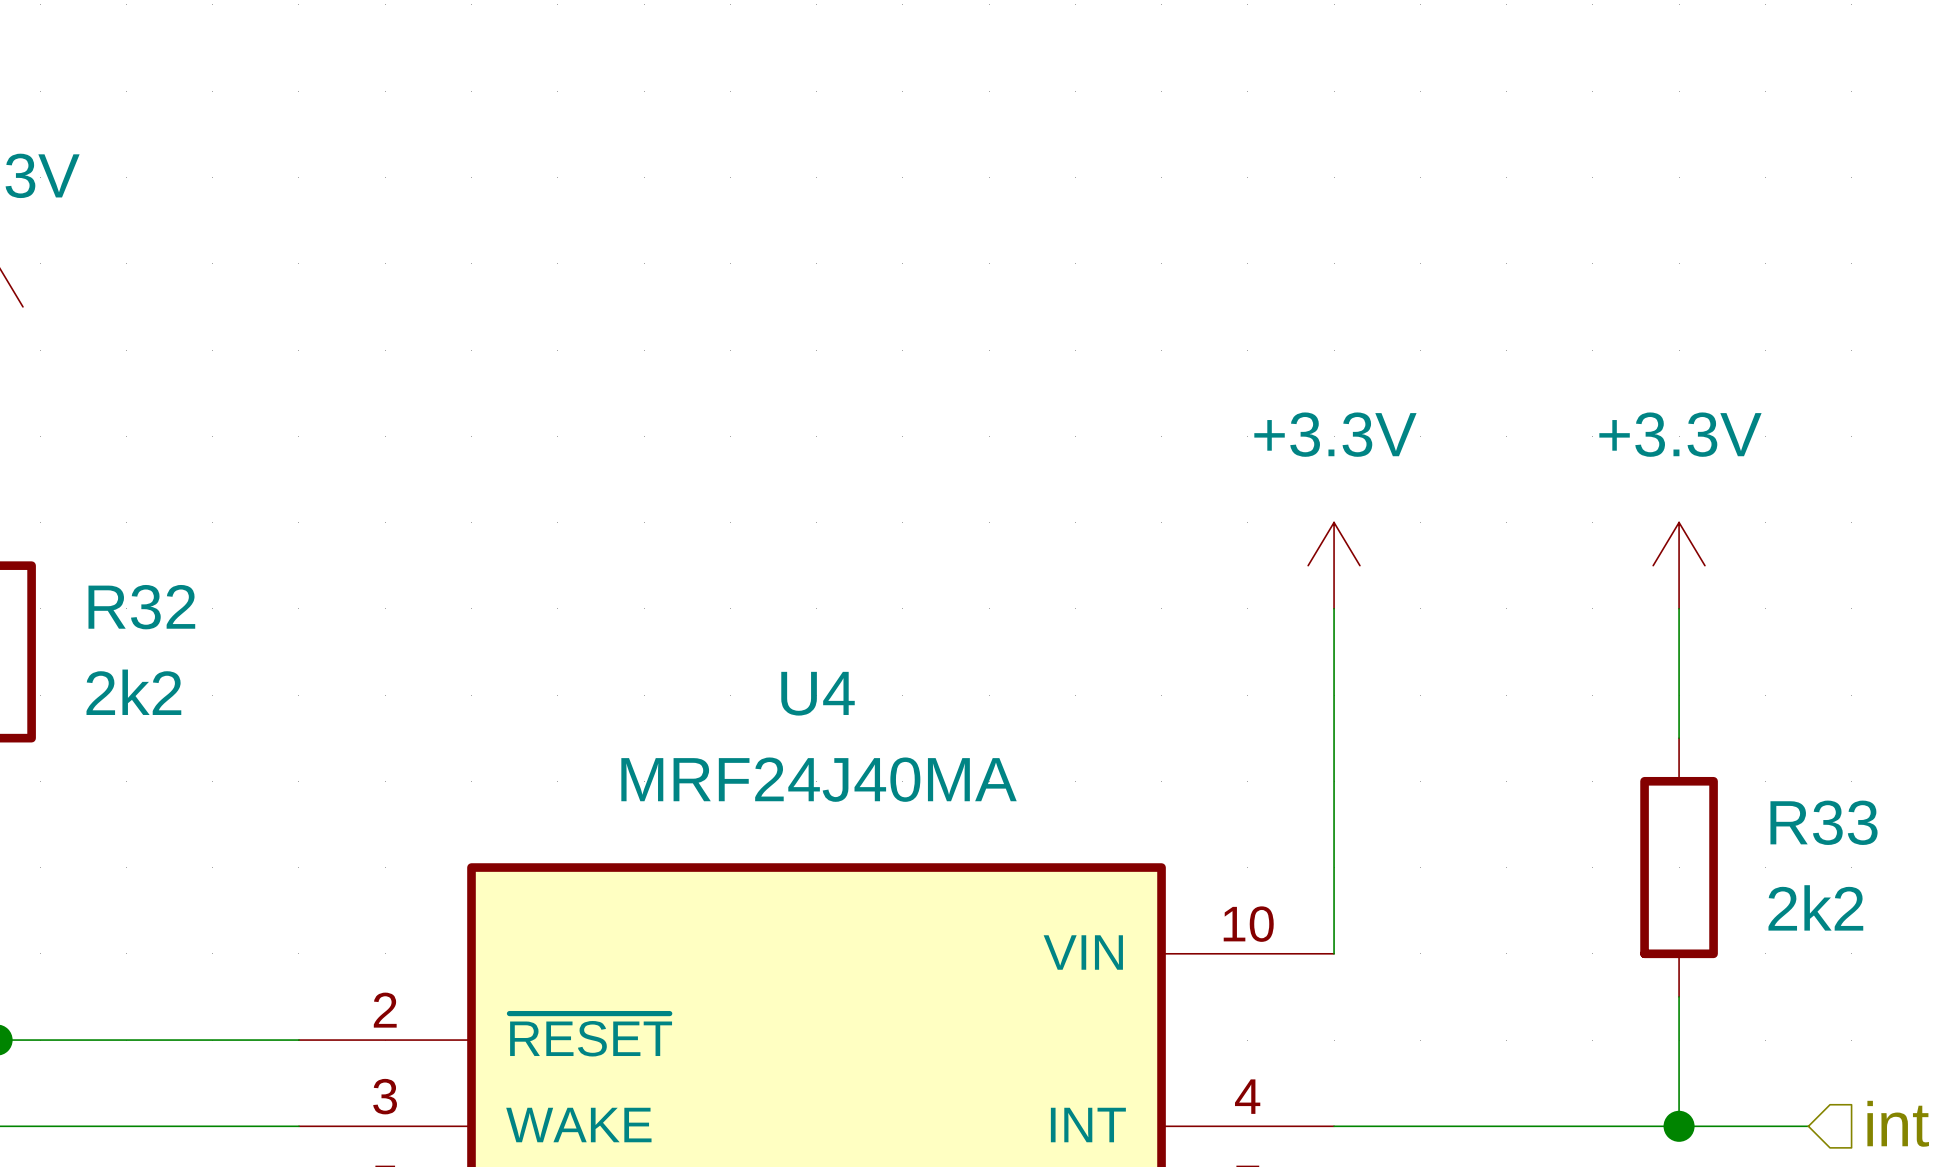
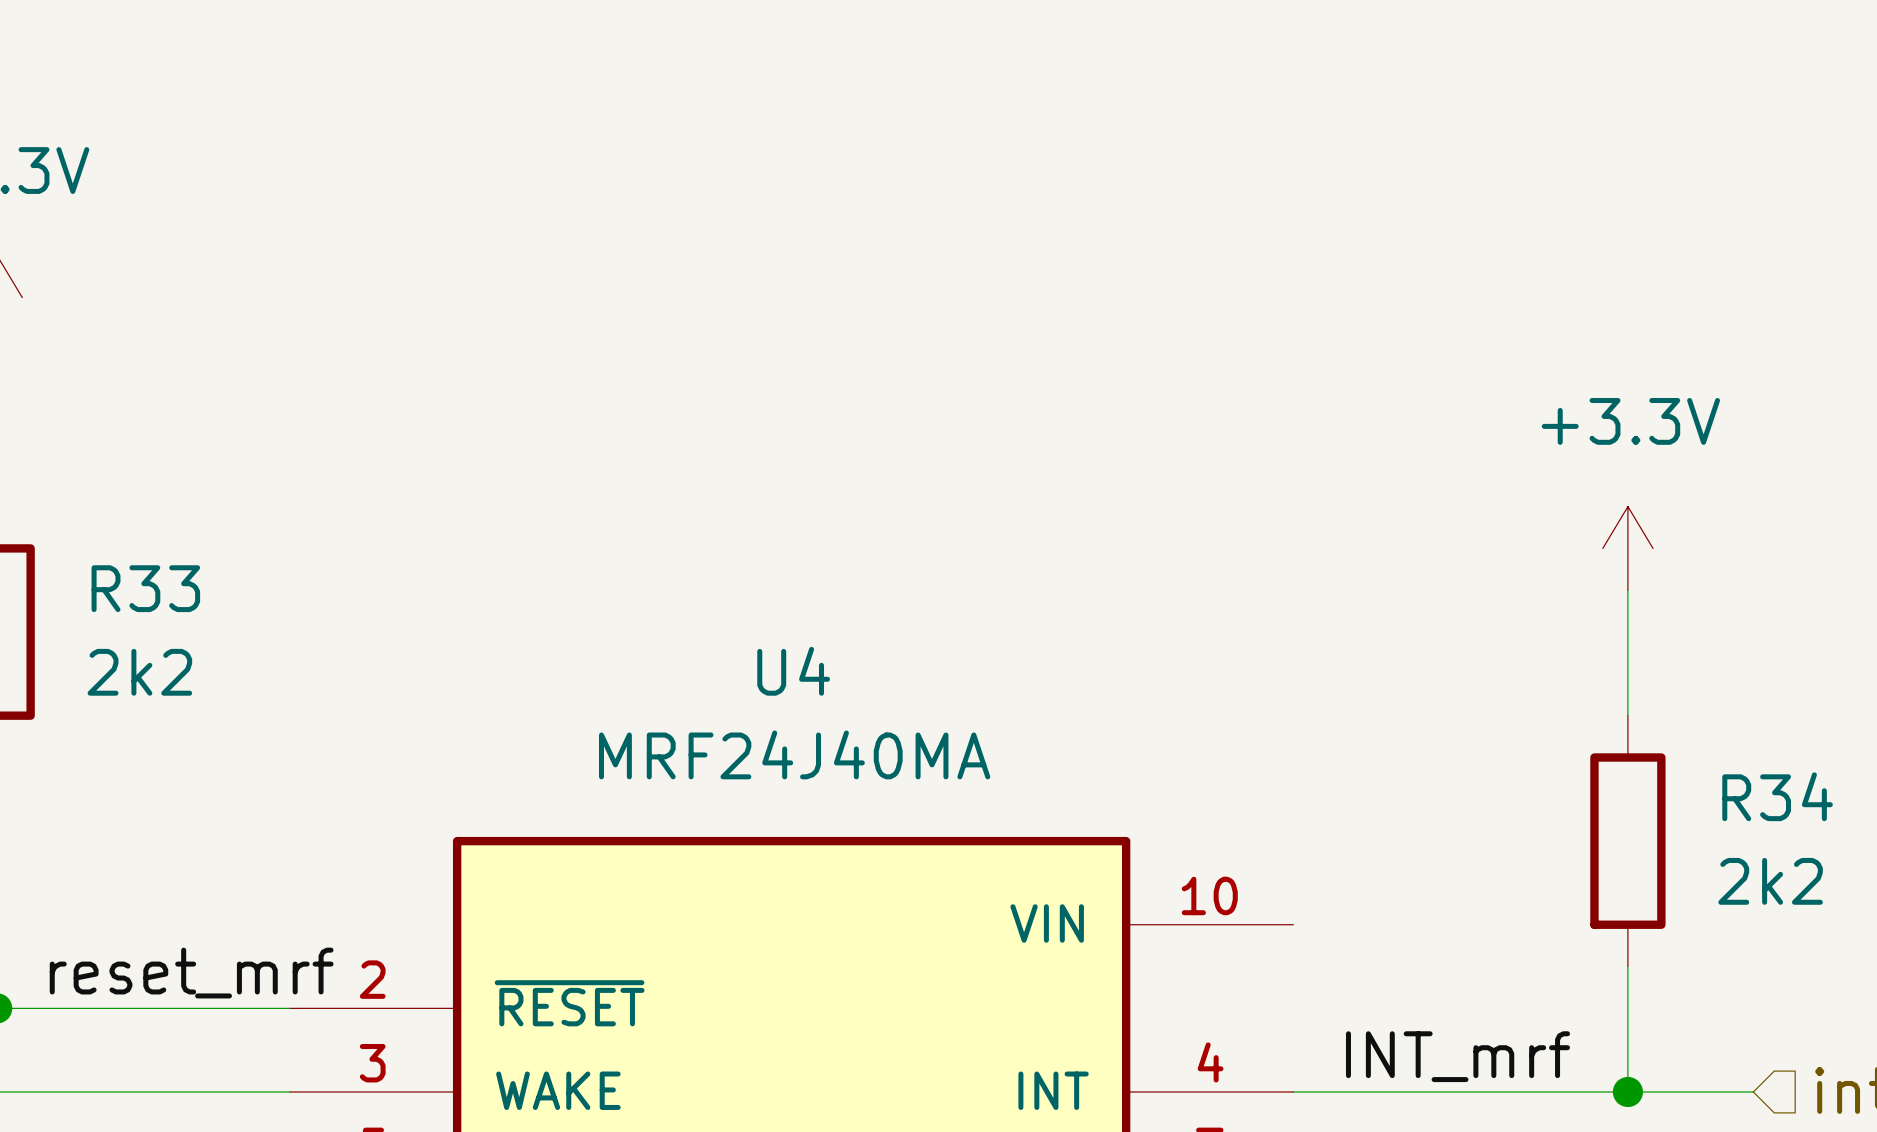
power symbol: +3.3V (1334, 565) -> none
R32 name: R32 (141, 607) -> R33 (145, 588)
wire: (1334, 608) (1334, 953) -> none
R33 name: R33 (1824, 822) -> R34 (1777, 796)
label: none -> reset_mrf (191, 973)
label: none -> INT_mrf (1457, 1056)

